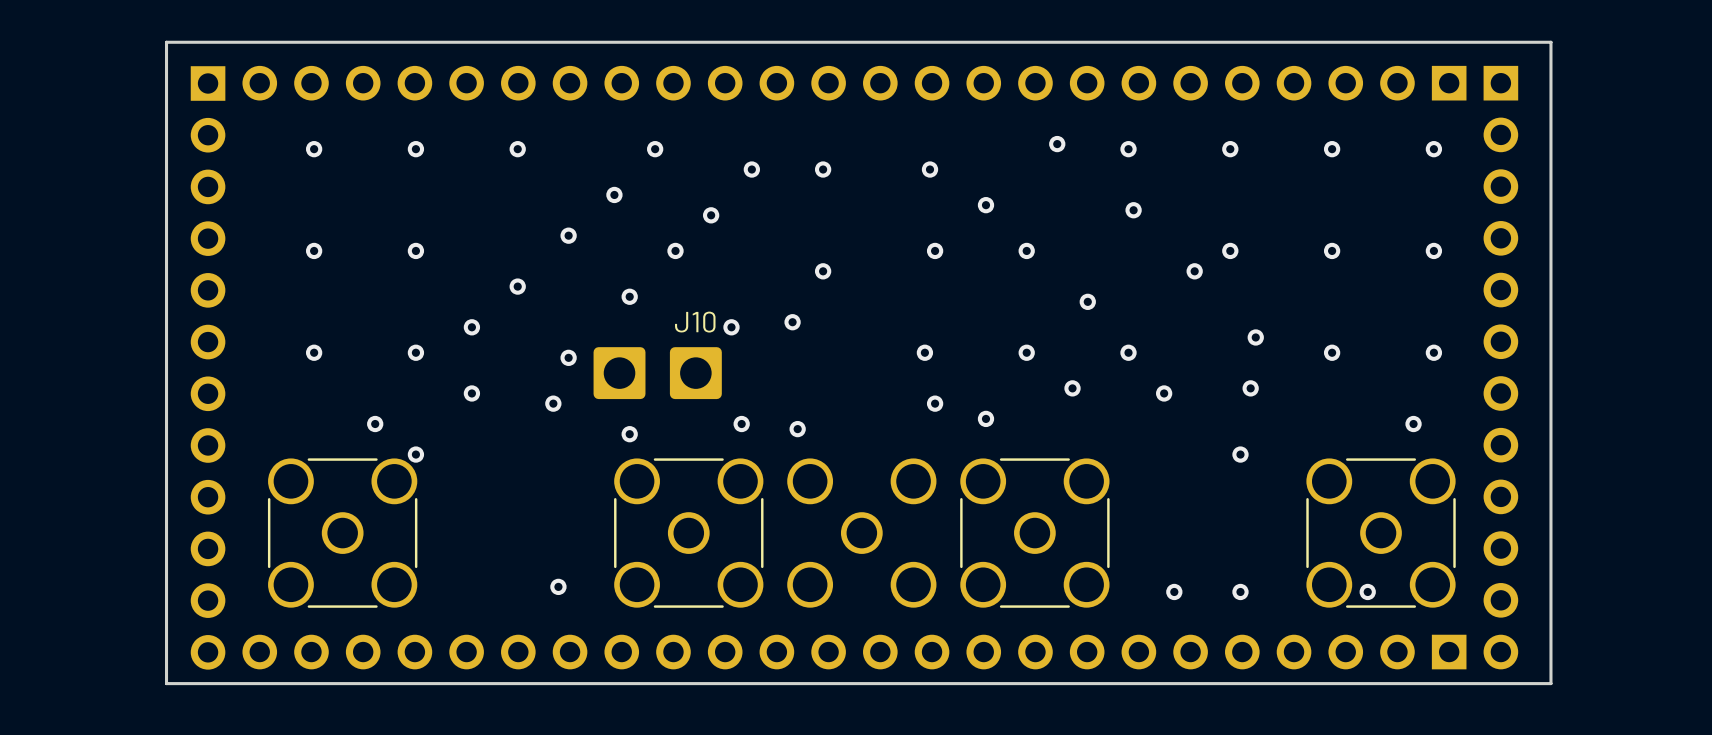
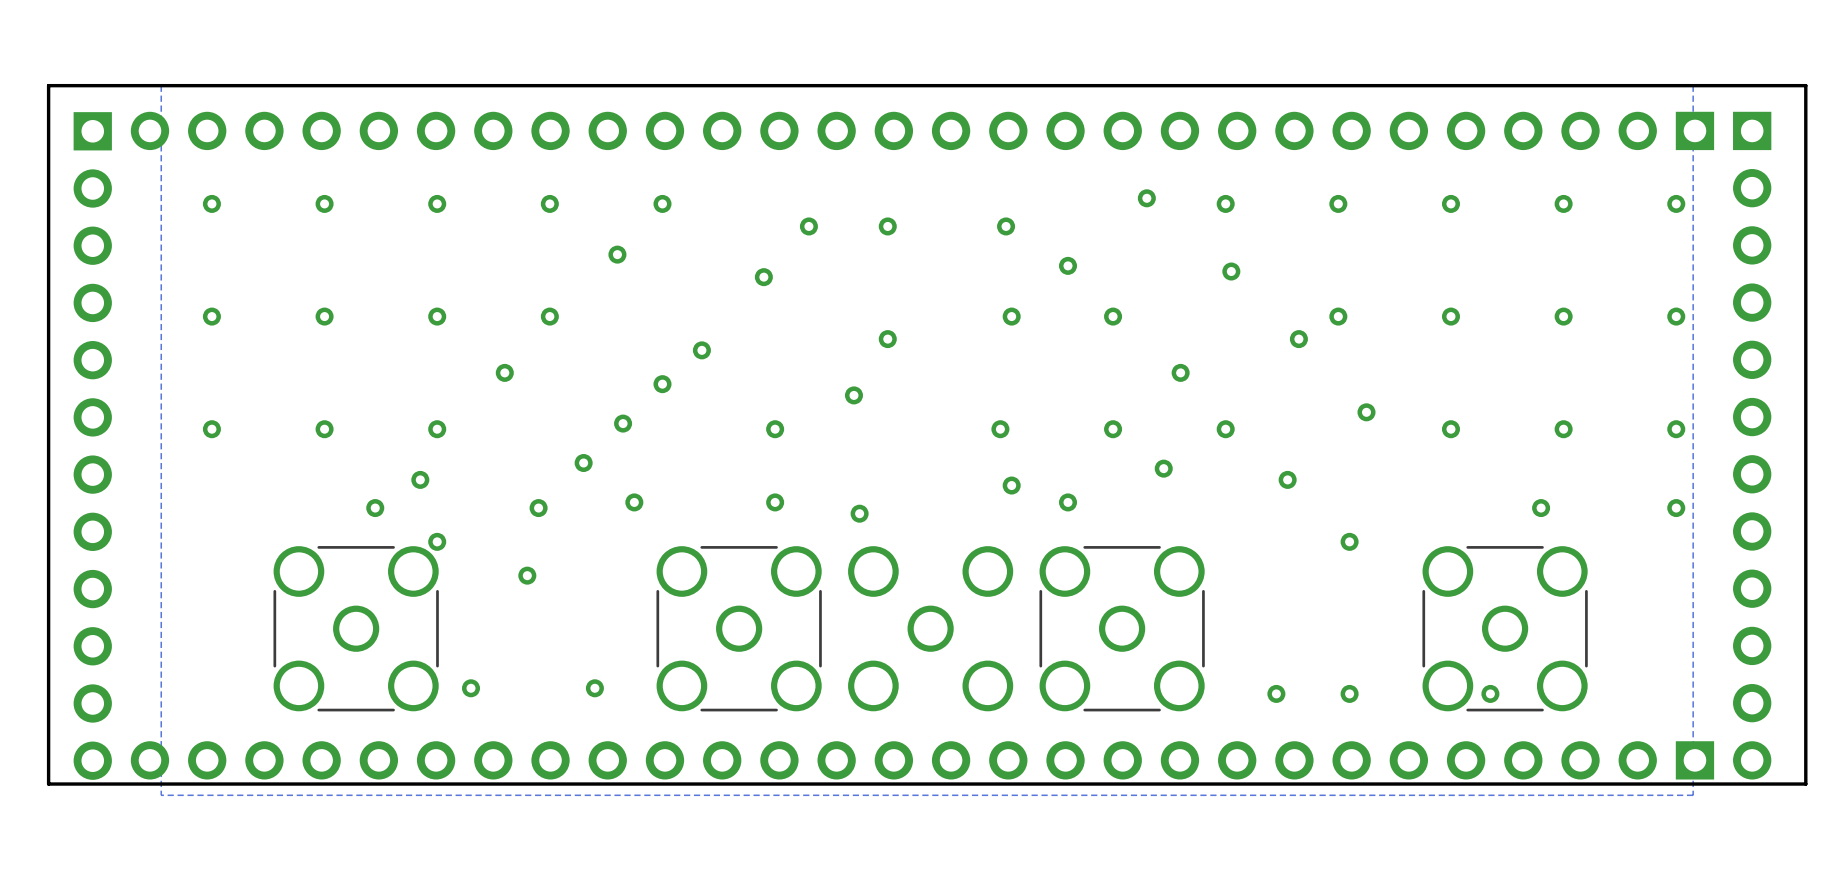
board edge: (1550, 42) (1550, 683) (166, 683) (166, 42) -> (1693, 85) (1805, 85) (1805, 784) (48, 784) (48, 85) (161, 85)
part footprint: [242, 65, 1467, 101] -> [130, 111, 1715, 151]
via: none -> (211, 203)
via: none -> (662, 203)
via: (655, 149) -> none
via: none -> (1676, 203)
via: none -> (617, 254)
via: (614, 194) -> none
via: (568, 235) -> none
via: none -> (211, 316)
via: none -> (549, 316)
via: (675, 250) -> none
via: none -> (1676, 316)
via: none -> (701, 350)
via: (517, 286) -> none
via position: (629, 296) -> (662, 384)
via: none -> (504, 372)
via: (471, 327) -> none
via position: (731, 327) -> (775, 429)
via: none -> (211, 429)
via: none -> (1676, 429)
via position: (568, 357) -> (623, 423)
part position: (208, 367) -> (92, 445)
part position: (1500, 367) -> (1752, 445)
part: (619, 373) -> none
J10: (695, 373) -> none
via: none -> (583, 463)
via: (1250, 388) -> none
via: (471, 393) -> none
via position: (1164, 393) -> (1287, 479)
via: none -> (420, 479)
via: (553, 403) -> none
via: none -> (634, 502)
via position: (375, 424) -> (375, 508)
via: none -> (538, 508)
via position: (741, 424) -> (775, 502)
via: none -> (1676, 508)
via: (629, 434) -> none
via: none -> (527, 575)
via: none -> (471, 688)
part footprint: [242, 634, 1467, 670] -> [130, 741, 1715, 780]

